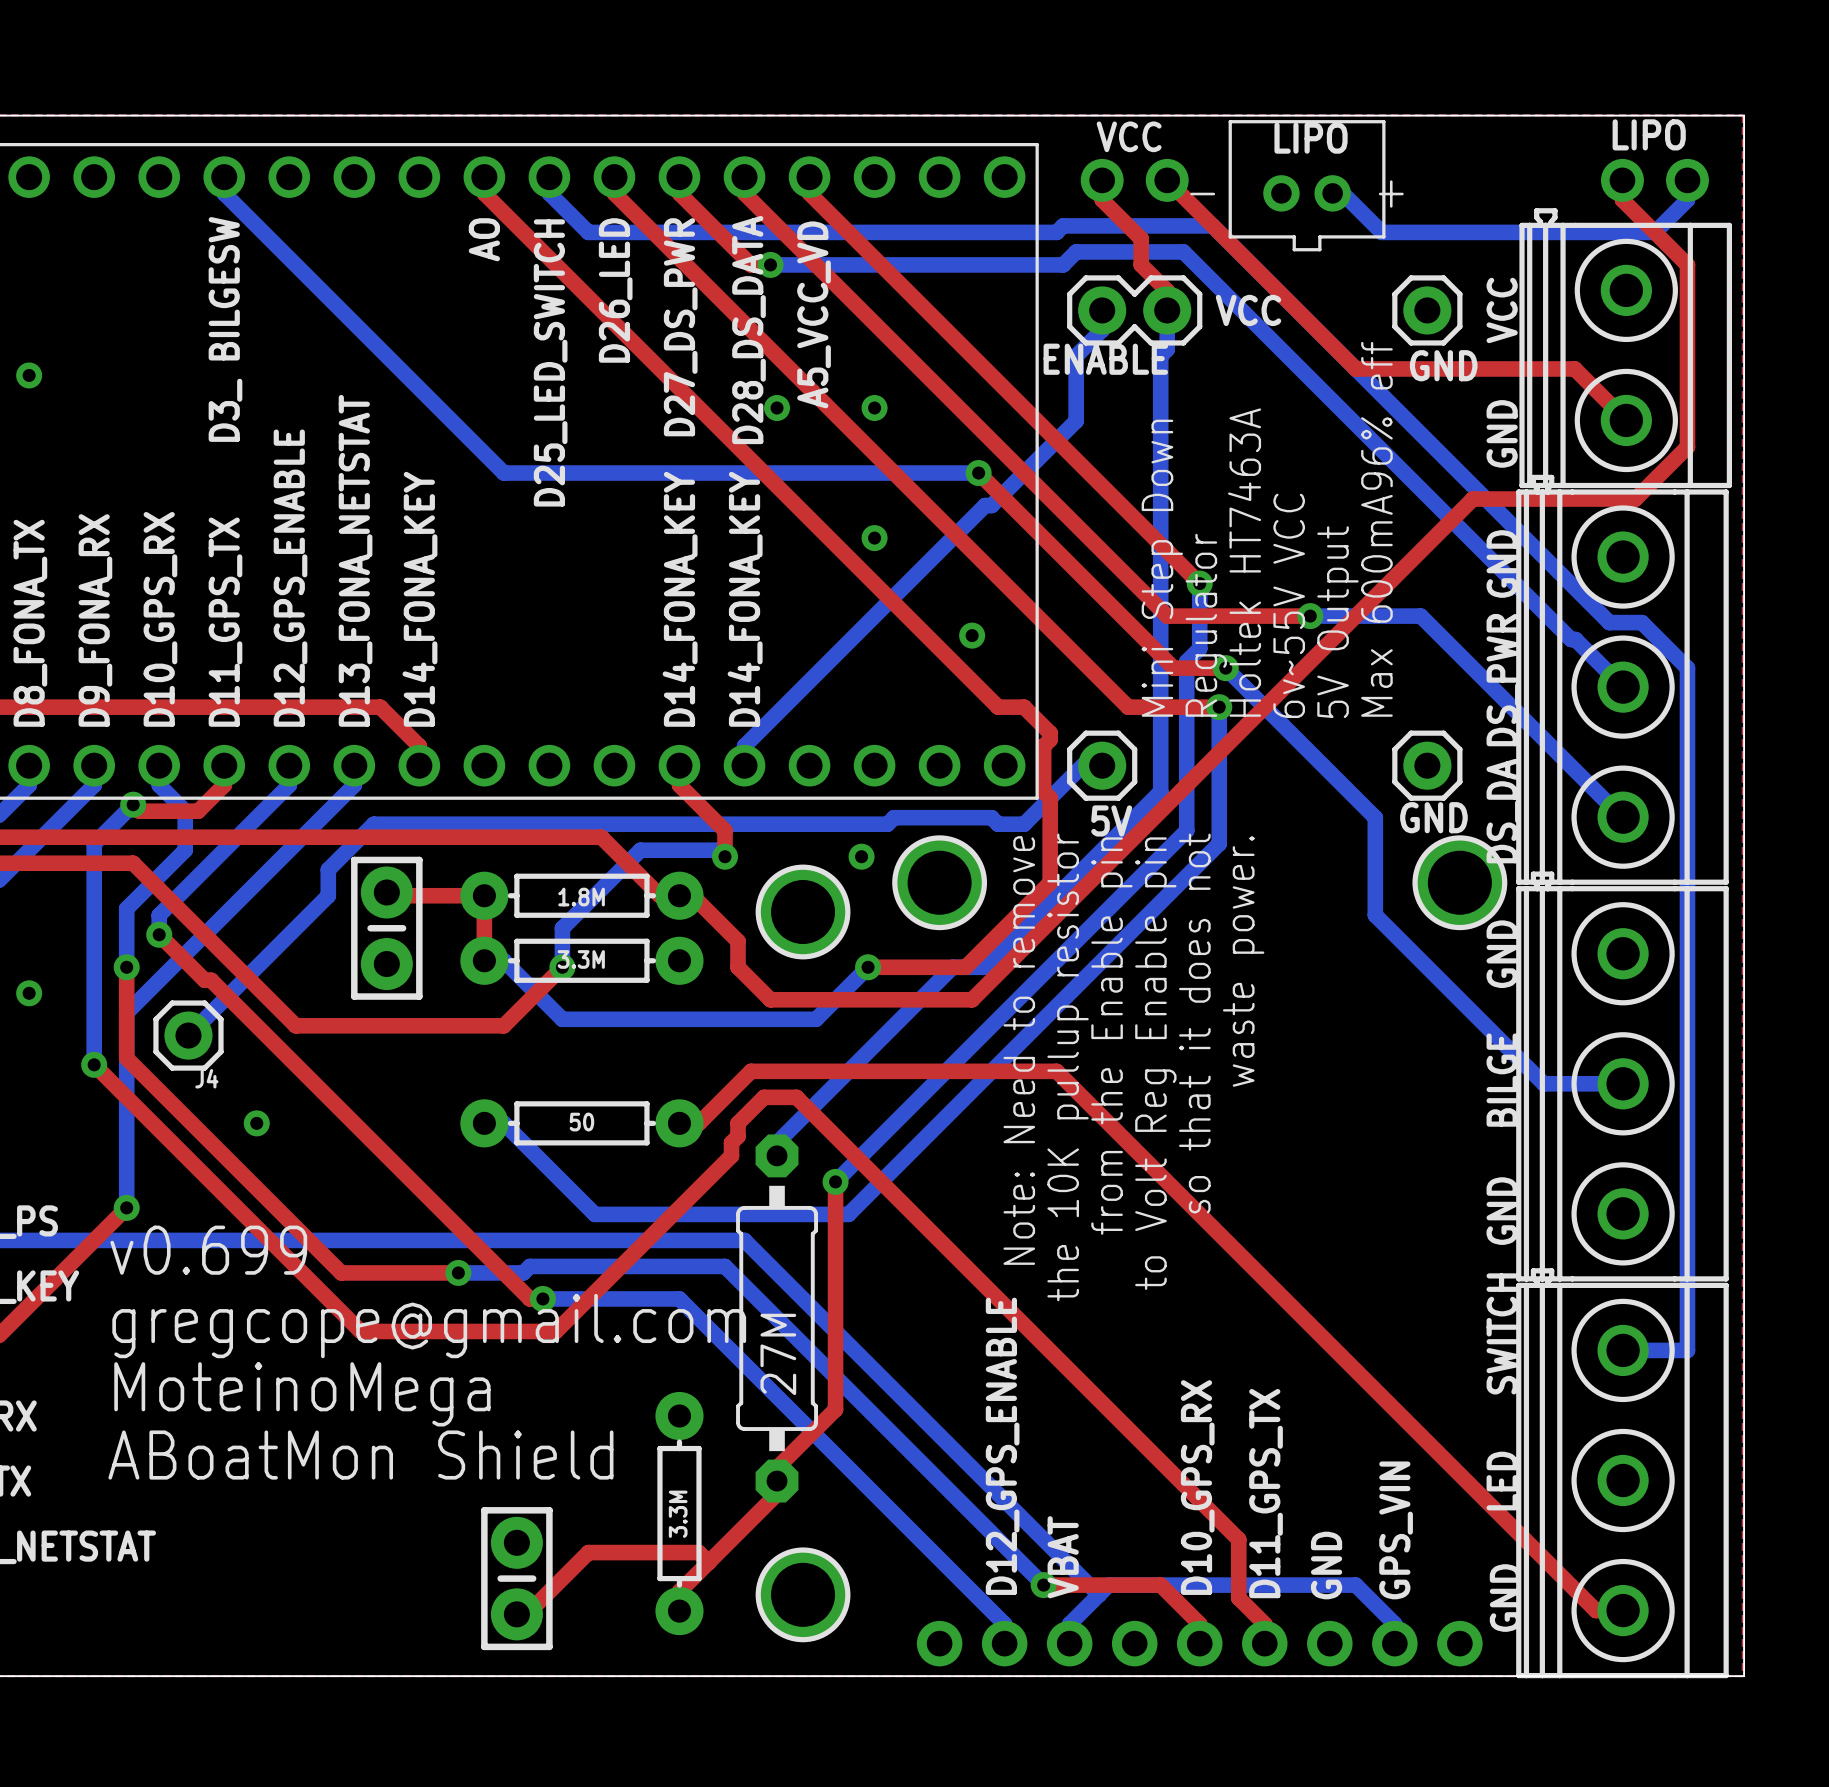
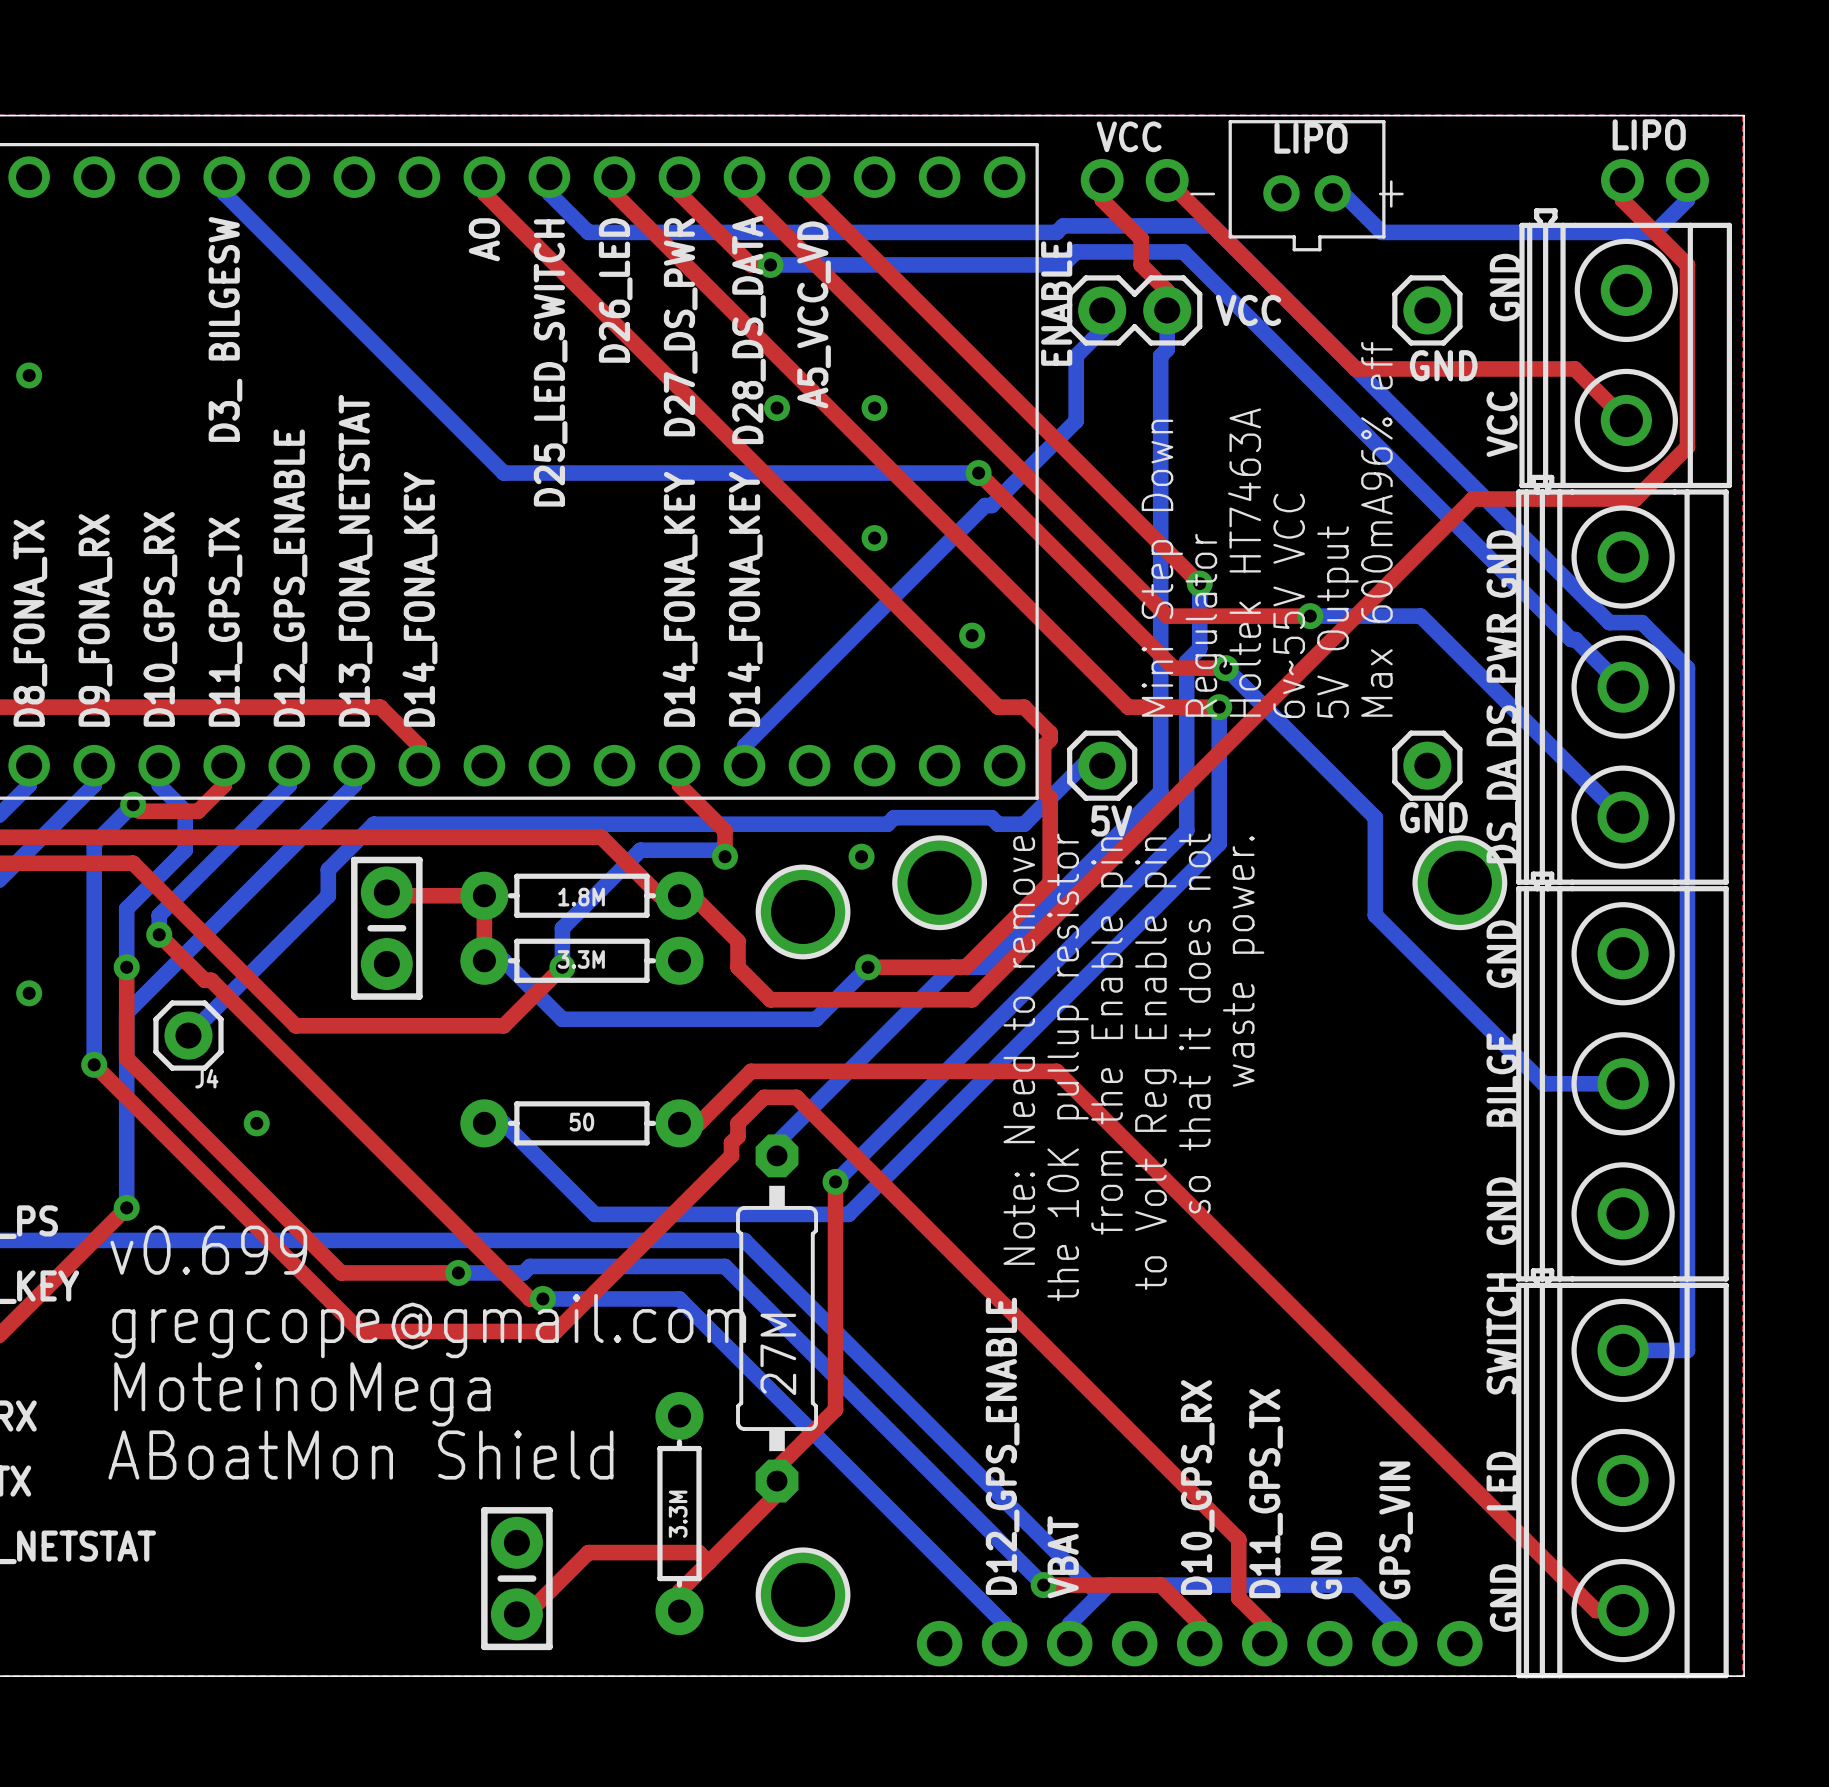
text position: VCC (1502, 310) -> VCC (1502, 424)
ENABLE name rotation: 0° (1105, 359) -> 90° counterclockwise (1056, 303)
text position: GND (1502, 433) -> GND (1505, 287)

